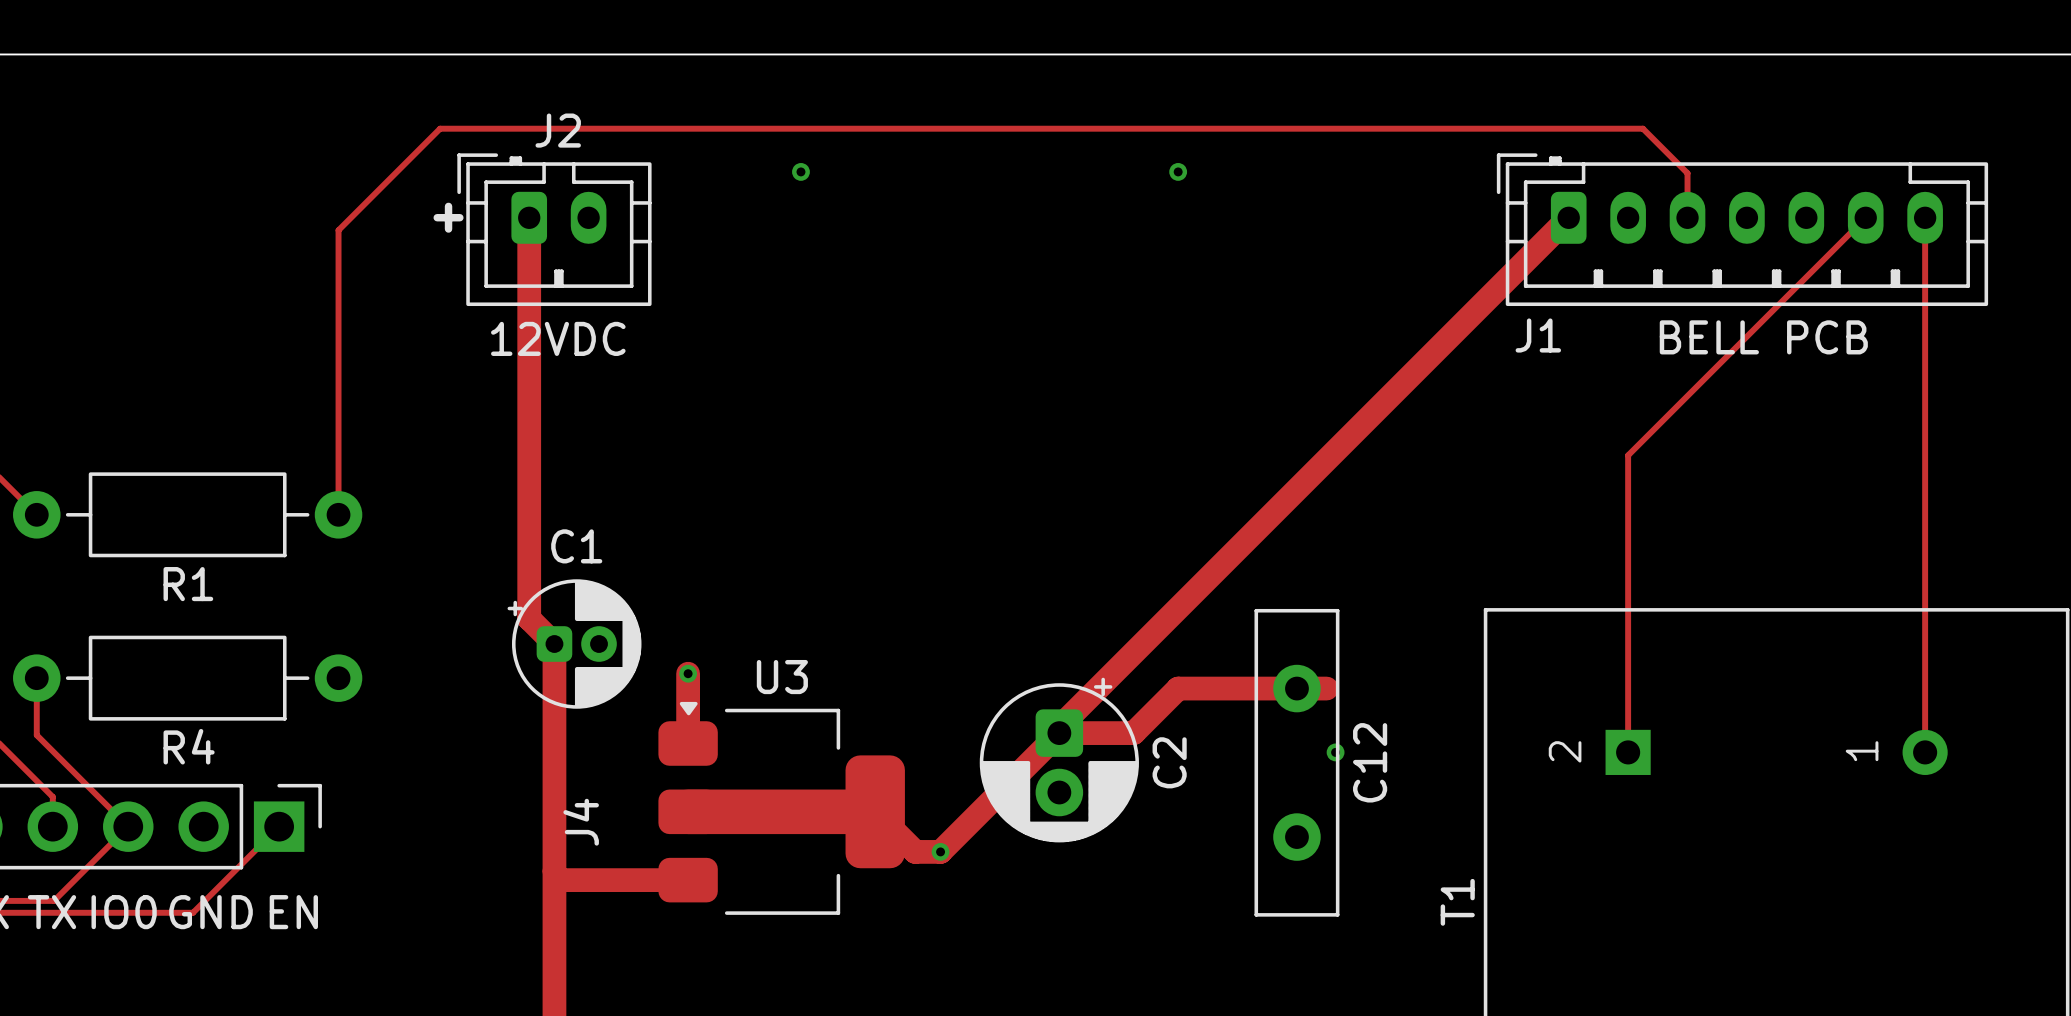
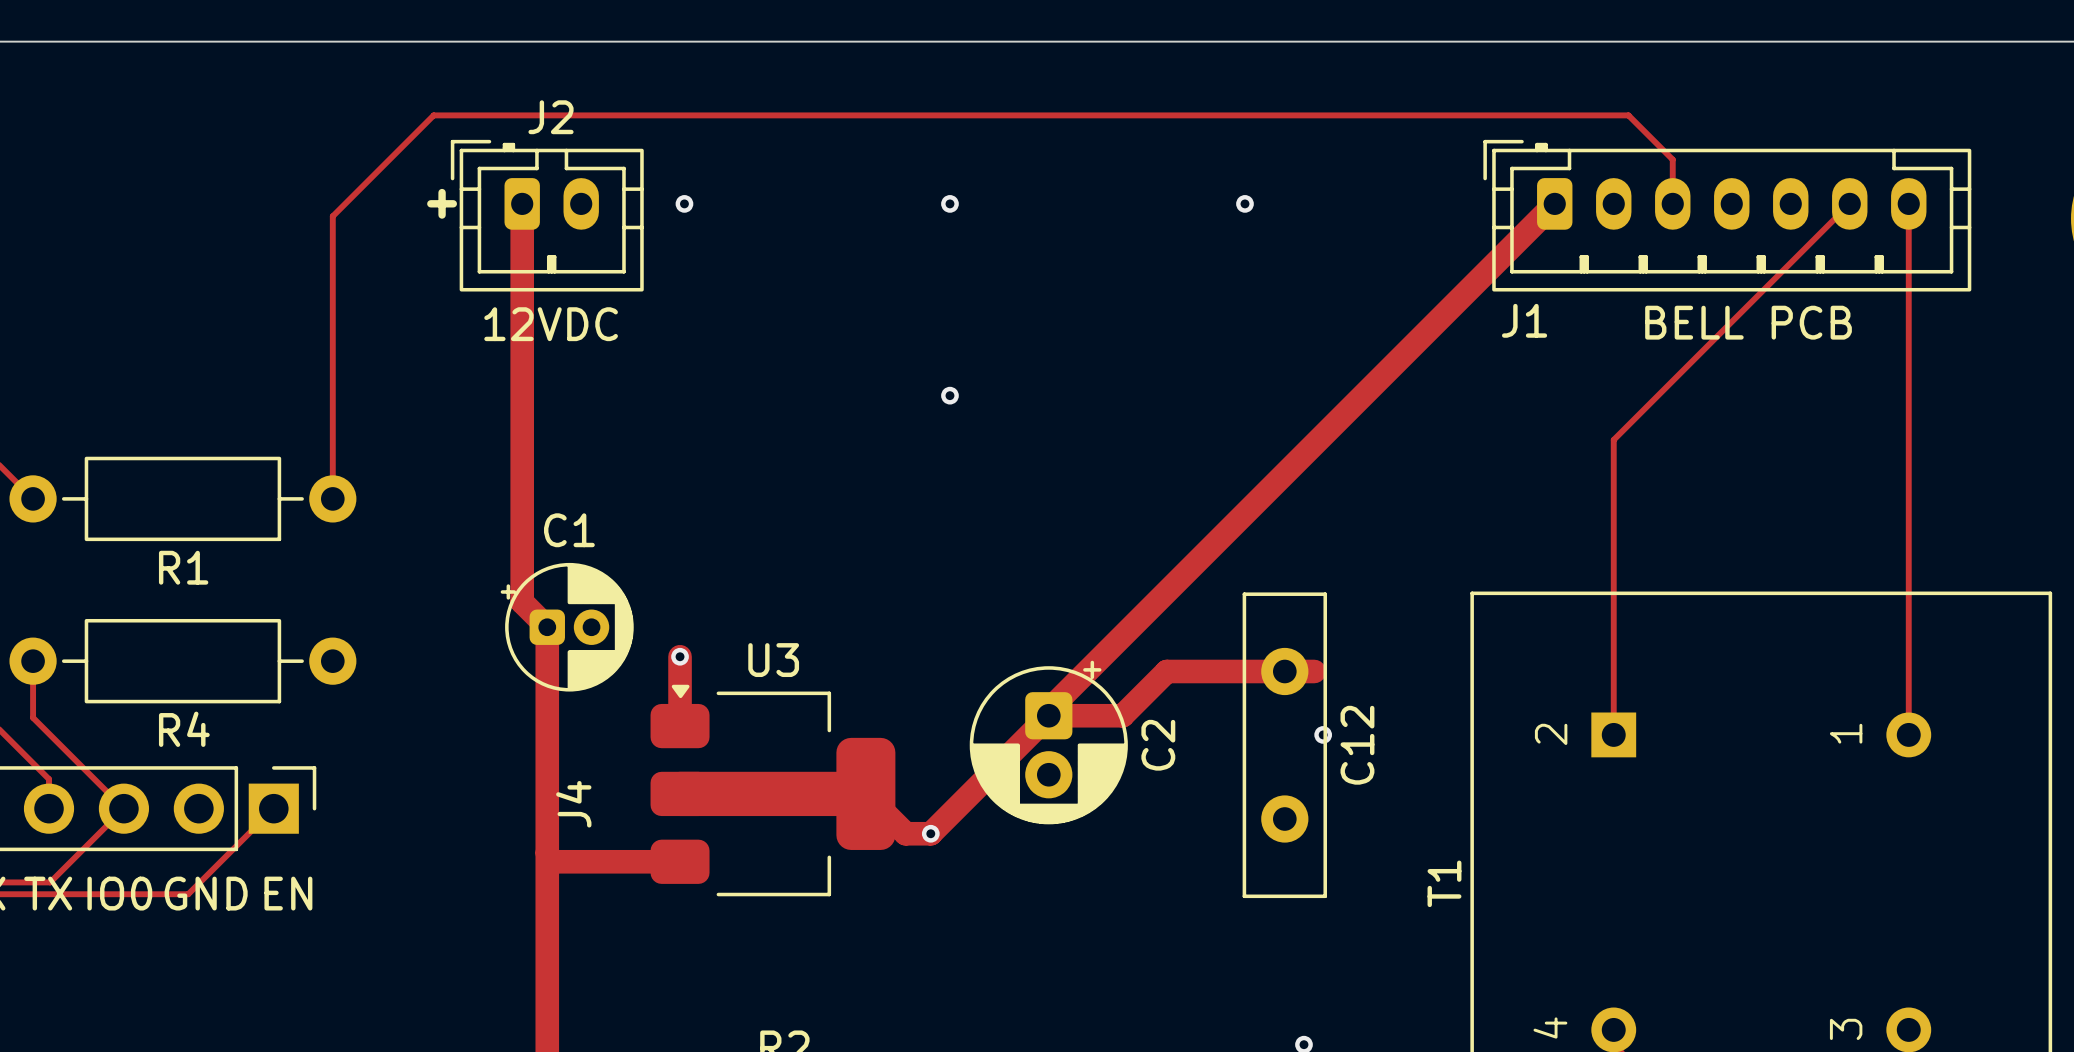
via: (800, 171) -> none
via position: (1178, 171) -> (1244, 203)
via: none -> (684, 203)
via: none -> (949, 203)
via: none -> (949, 395)

